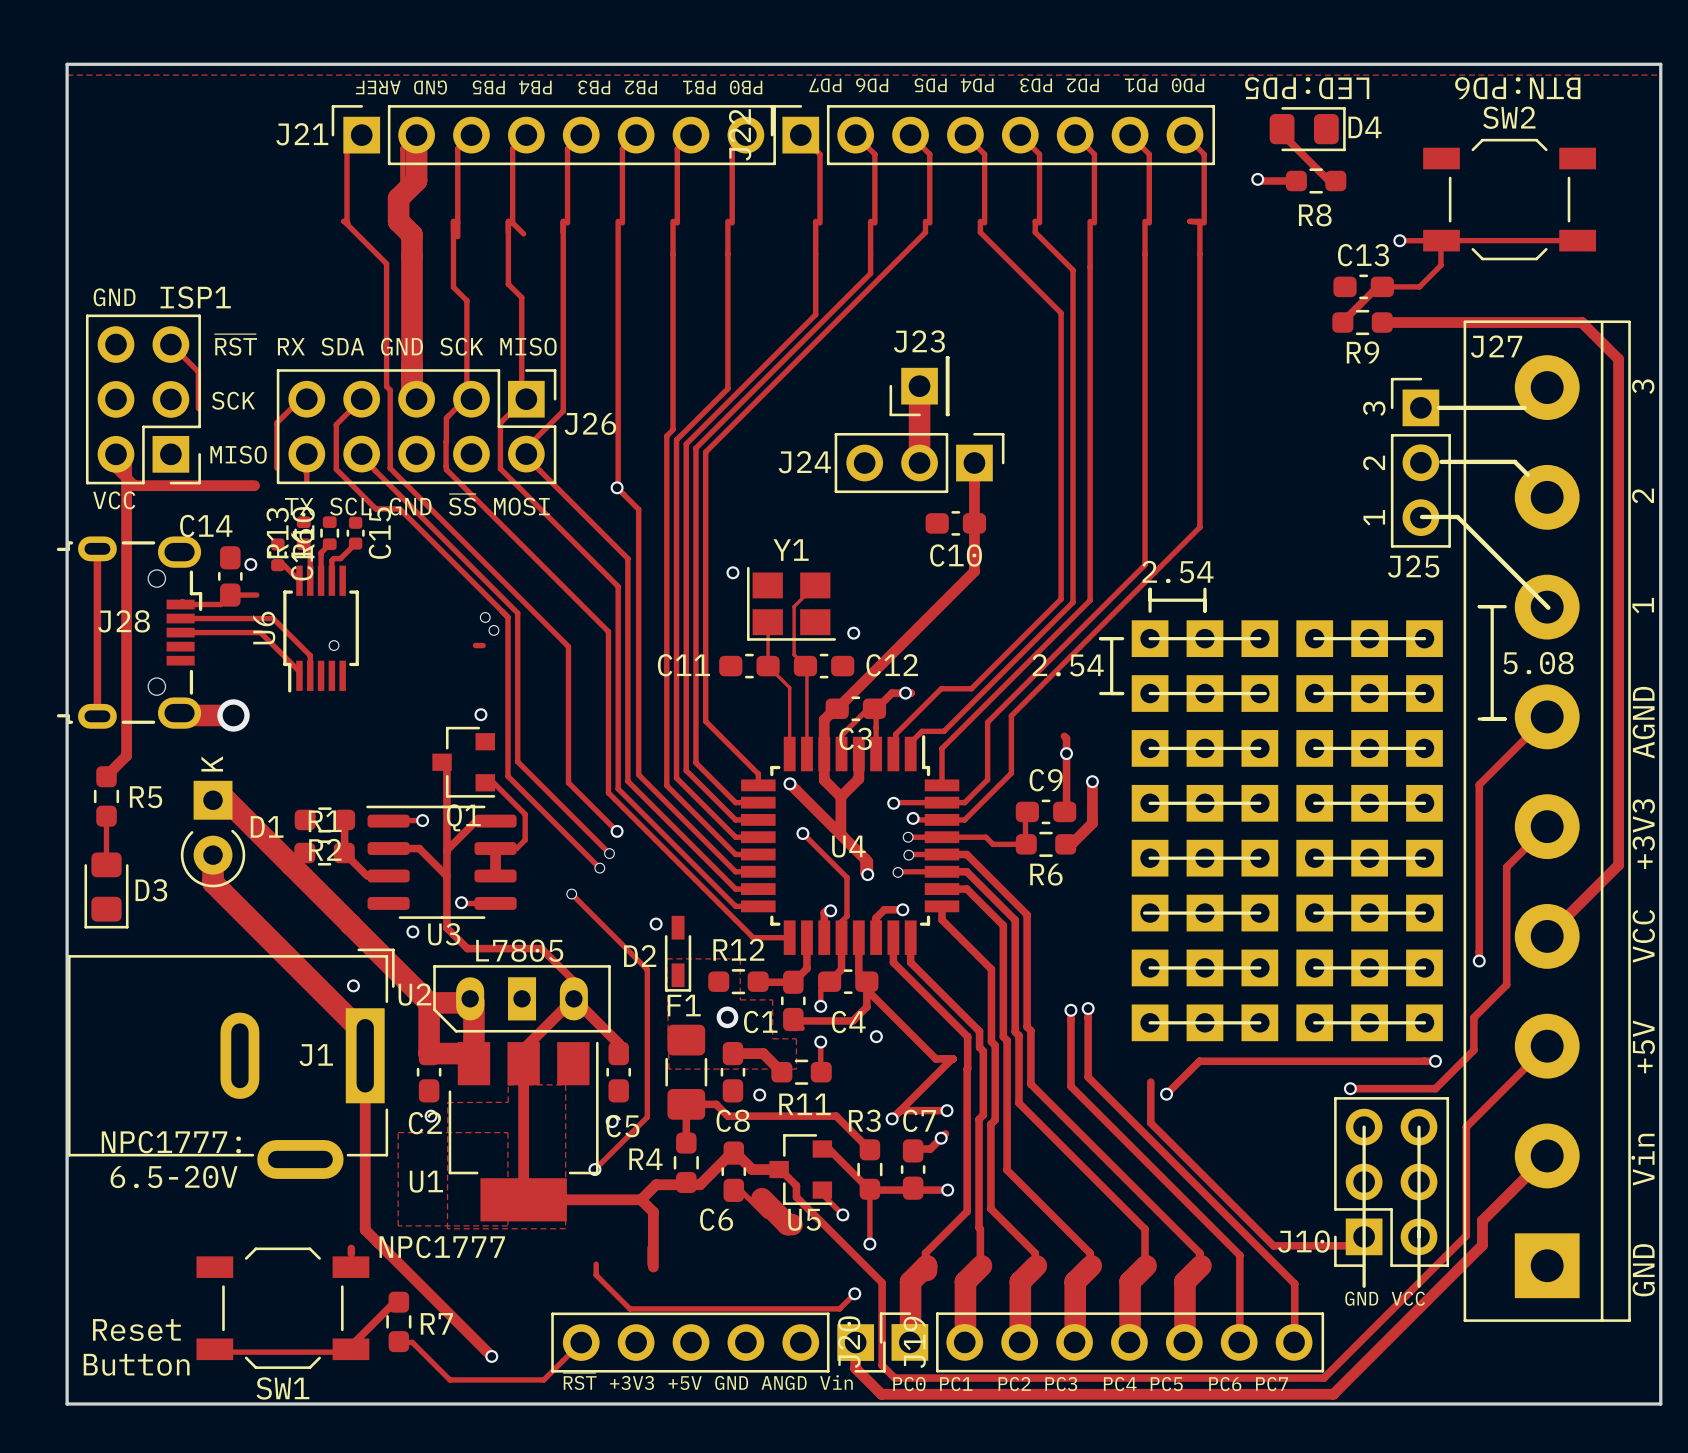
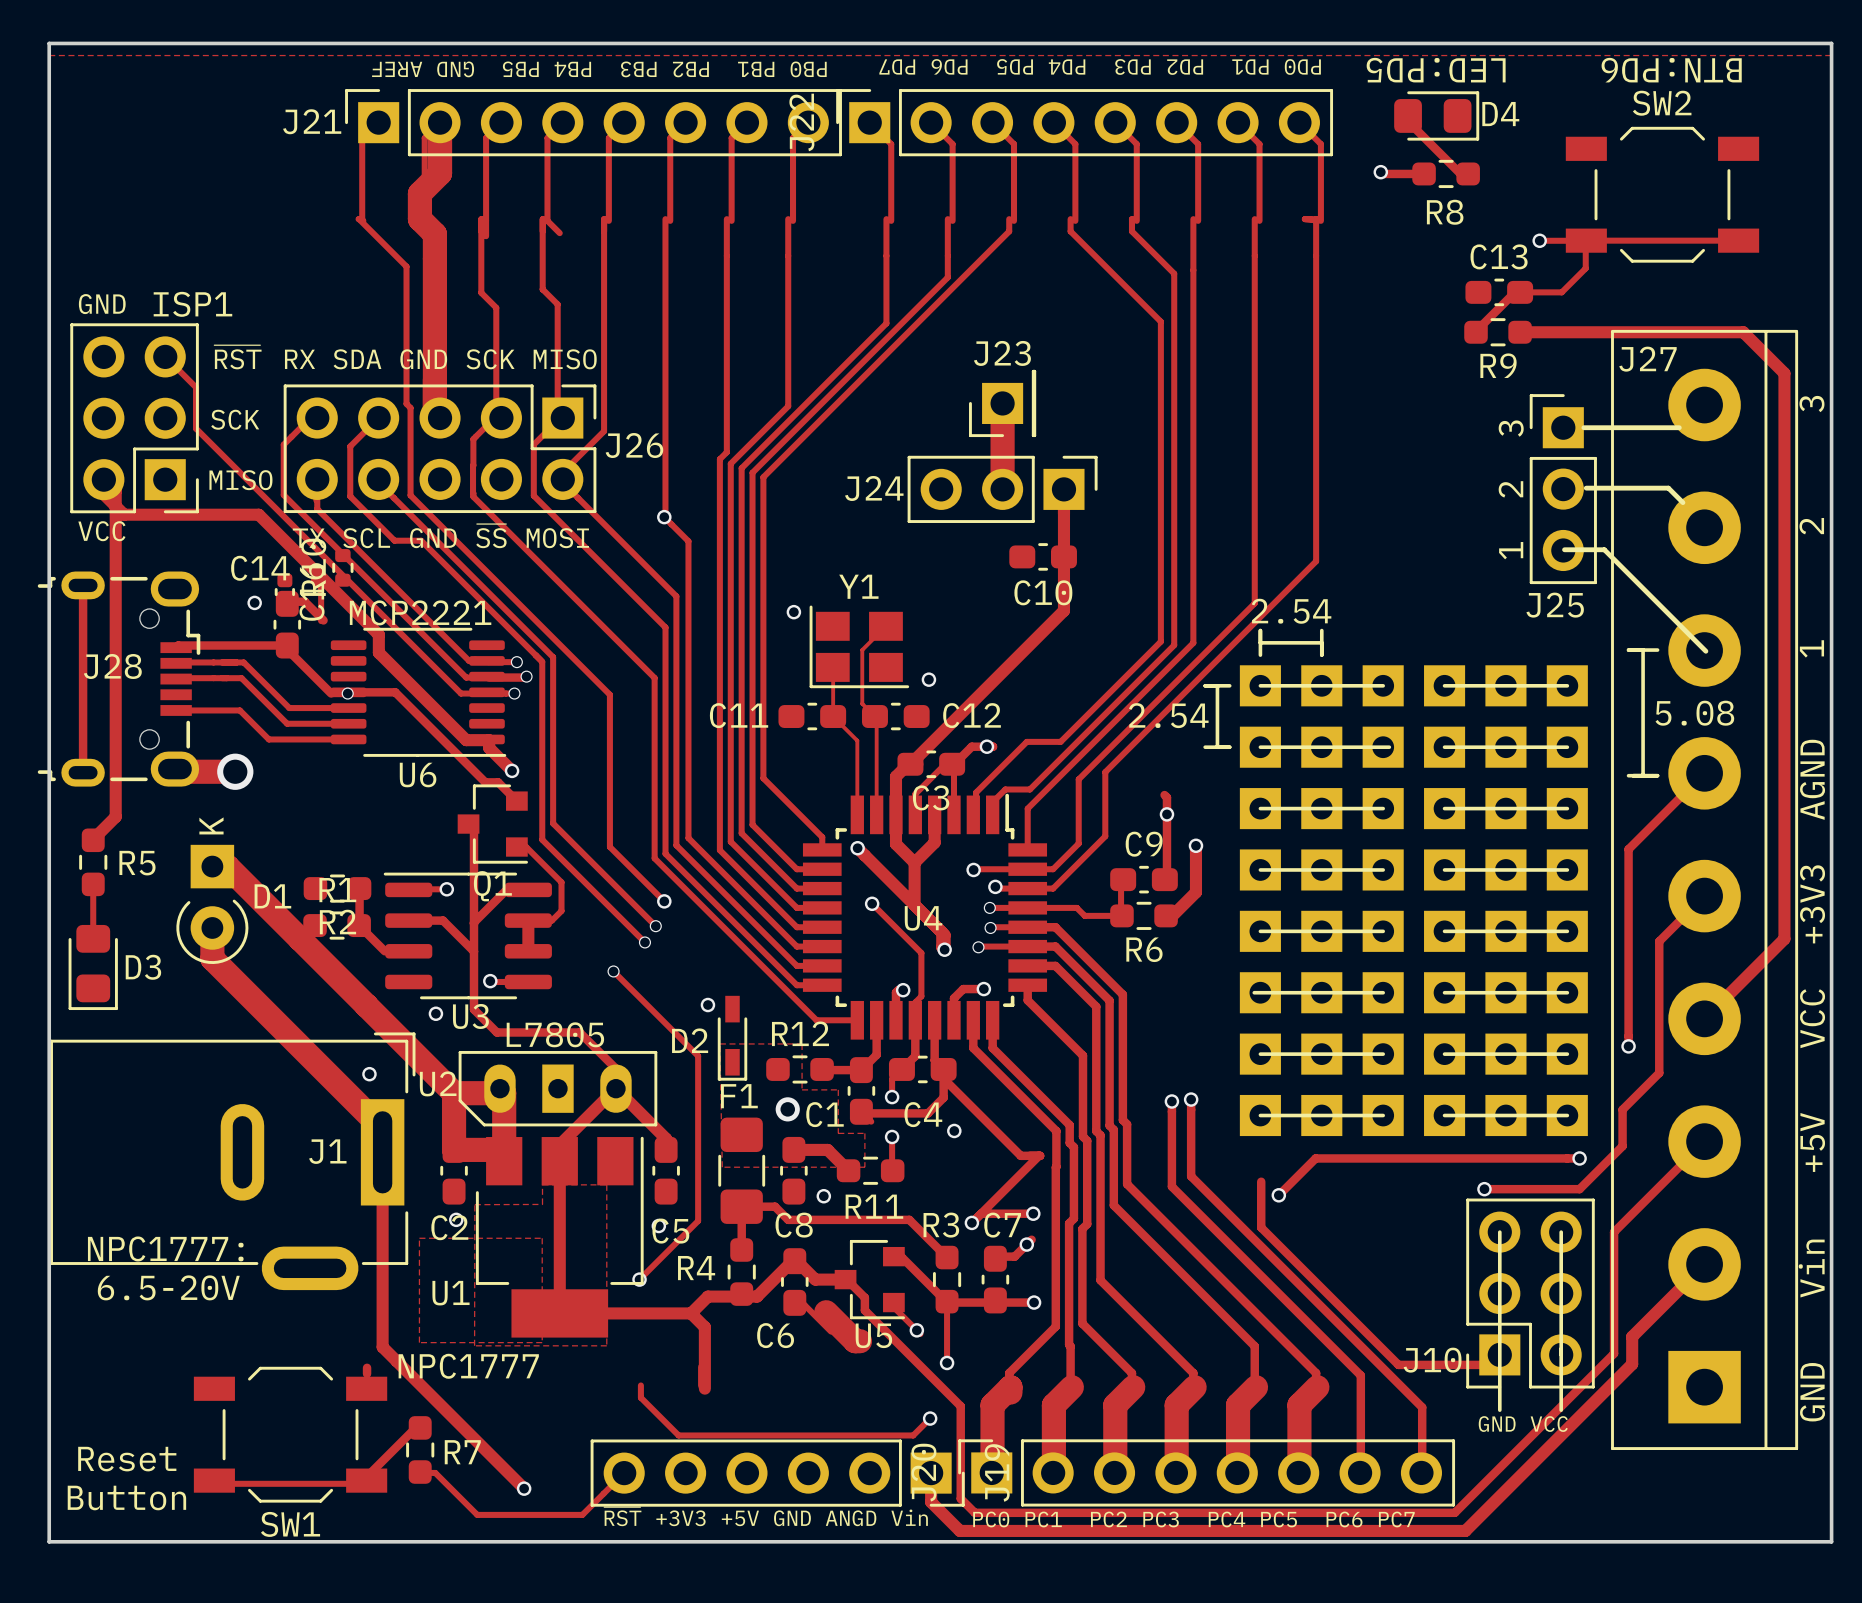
track: none -> (196, 428) (461, 693) (505, 693)
track: none -> (283, 495) (466, 677) (525, 677)
track: none -> (317, 509) (469, 660) (516, 662)
track: none -> (258, 514) (378, 634) (378, 652) (466, 740) (489, 740) (489, 748) (512, 770)
R13: (303, 533) -> none
C15: (355, 533) -> none
track: (355, 543) (340, 558) (331, 560) (331, 580) -> none
track: (329, 544) (321, 552) (321, 580) -> none
track: none -> (287, 601) (304, 601) (323, 620)
track: (277, 565) (283, 565) (299, 580) -> none
U6 footprint: [283, 565, 359, 693] -> [330, 627, 507, 757]
text: none -> MCP2221 (420, 612)
C14 position: (230, 576) -> (287, 624)
track: (256, 595) (230, 595) (220, 604) (180, 604) -> none
track: none -> (178, 645) (287, 645)
track: none -> (287, 647) (331, 693)
track: none -> (191, 662) (243, 662) (289, 708) (348, 708)
track: (180, 618) (273, 618) (310, 655) (310, 675) -> none
U6 name position: U6 (264, 628) -> U6 (418, 775)
track: none -> (191, 678) (241, 678) (287, 723) (348, 723)
track: (180, 632) (260, 632) (299, 671) (299, 675) -> none
track: none -> (348, 692) (395, 692) (485, 782) (498, 782) (518, 802)
via: none -> (514, 693)
track: none -> (176, 710) (239, 710) (268, 739) (348, 739)

